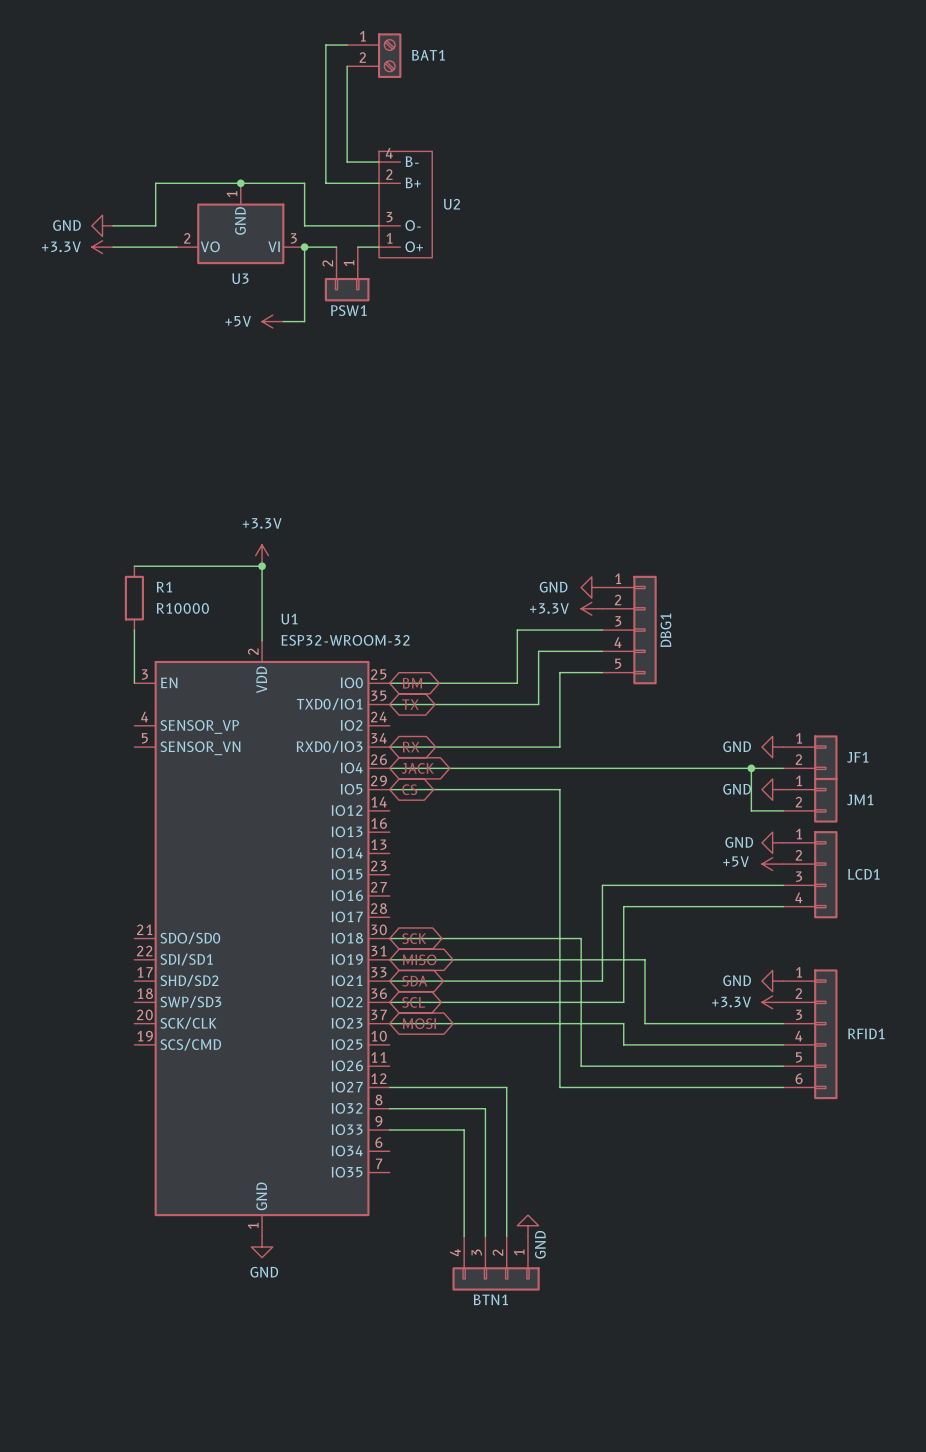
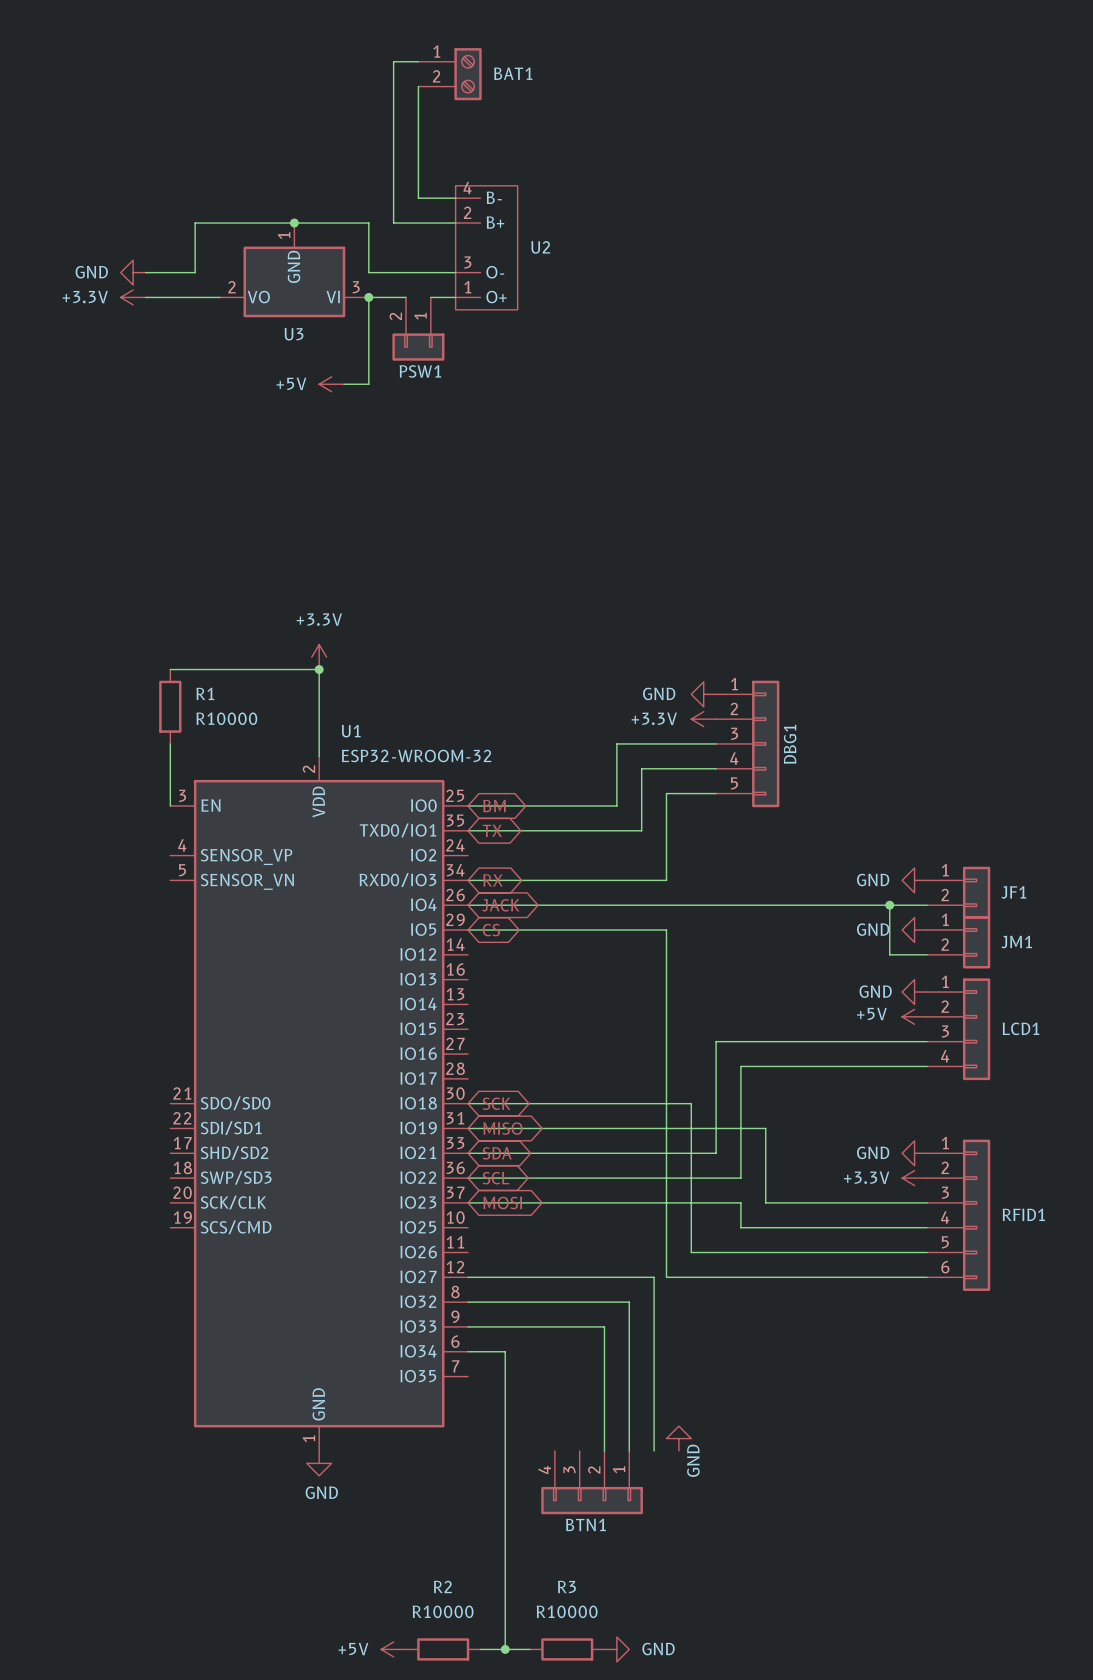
wire: (506, 1087) (506, 1130) -> (554, 1326) (604, 1326)
wire: none -> (604, 1277) (654, 1277) (654, 1450)
wire: (485, 1108) (485, 1236) -> (579, 1302) (629, 1302) (629, 1450)
wire: (464, 1130) (464, 1236) -> none
wire: none -> (468, 1351) (505, 1351) (505, 1649)
power symbol position: GND (527, 1225) -> GND (678, 1438)
power symbol: none -> +5V (393, 1649)
R2: none -> R10000 (443, 1649)
wire: none -> (480, 1649) (530, 1649)
junction: none -> (505, 1649)
R3: none -> R10000 (567, 1649)
power symbol: none -> GND (616, 1649)

